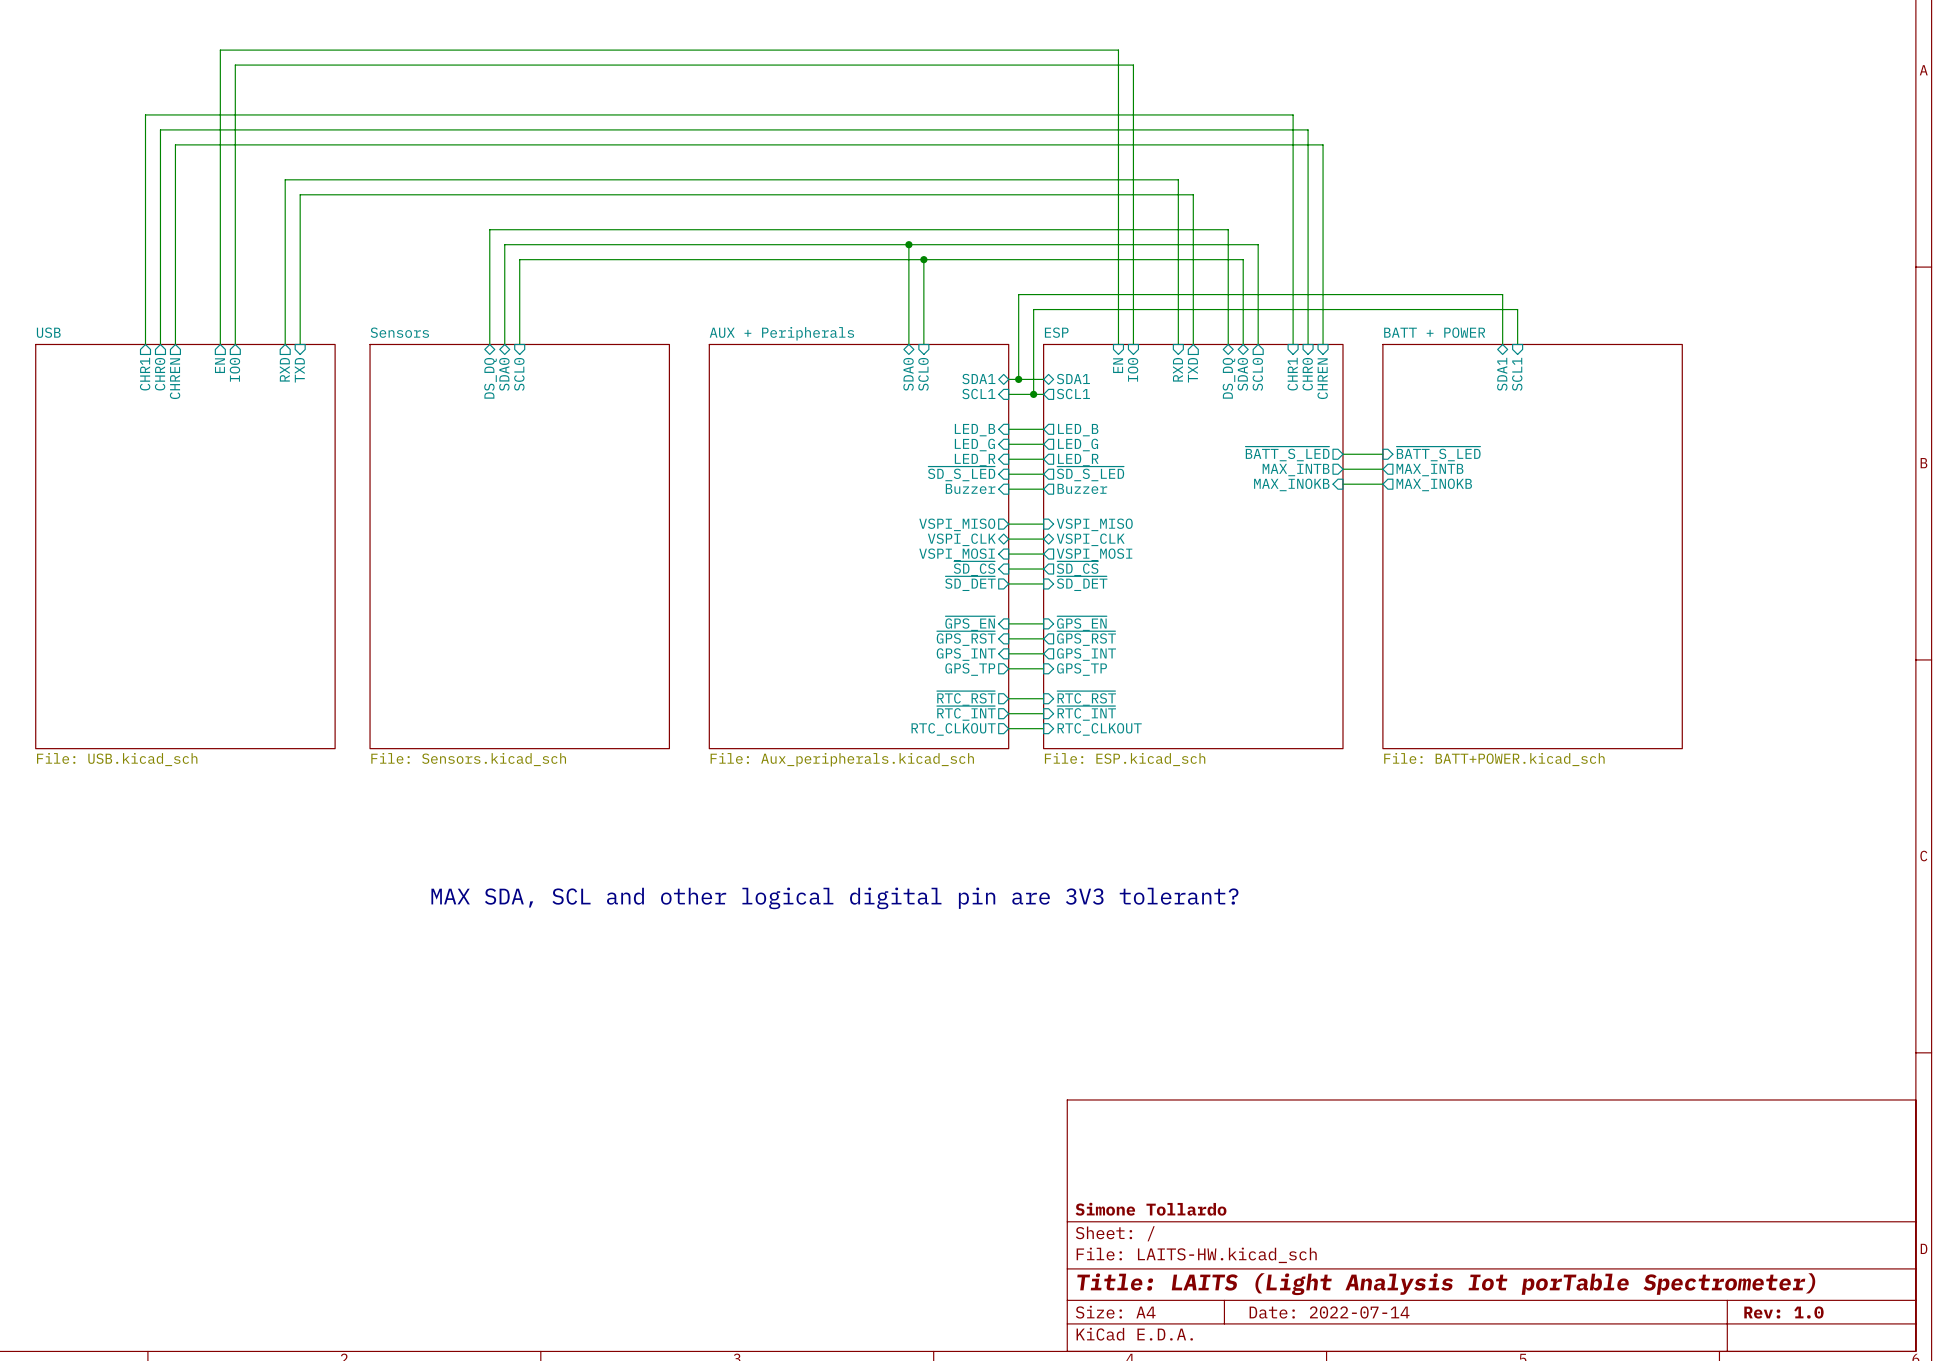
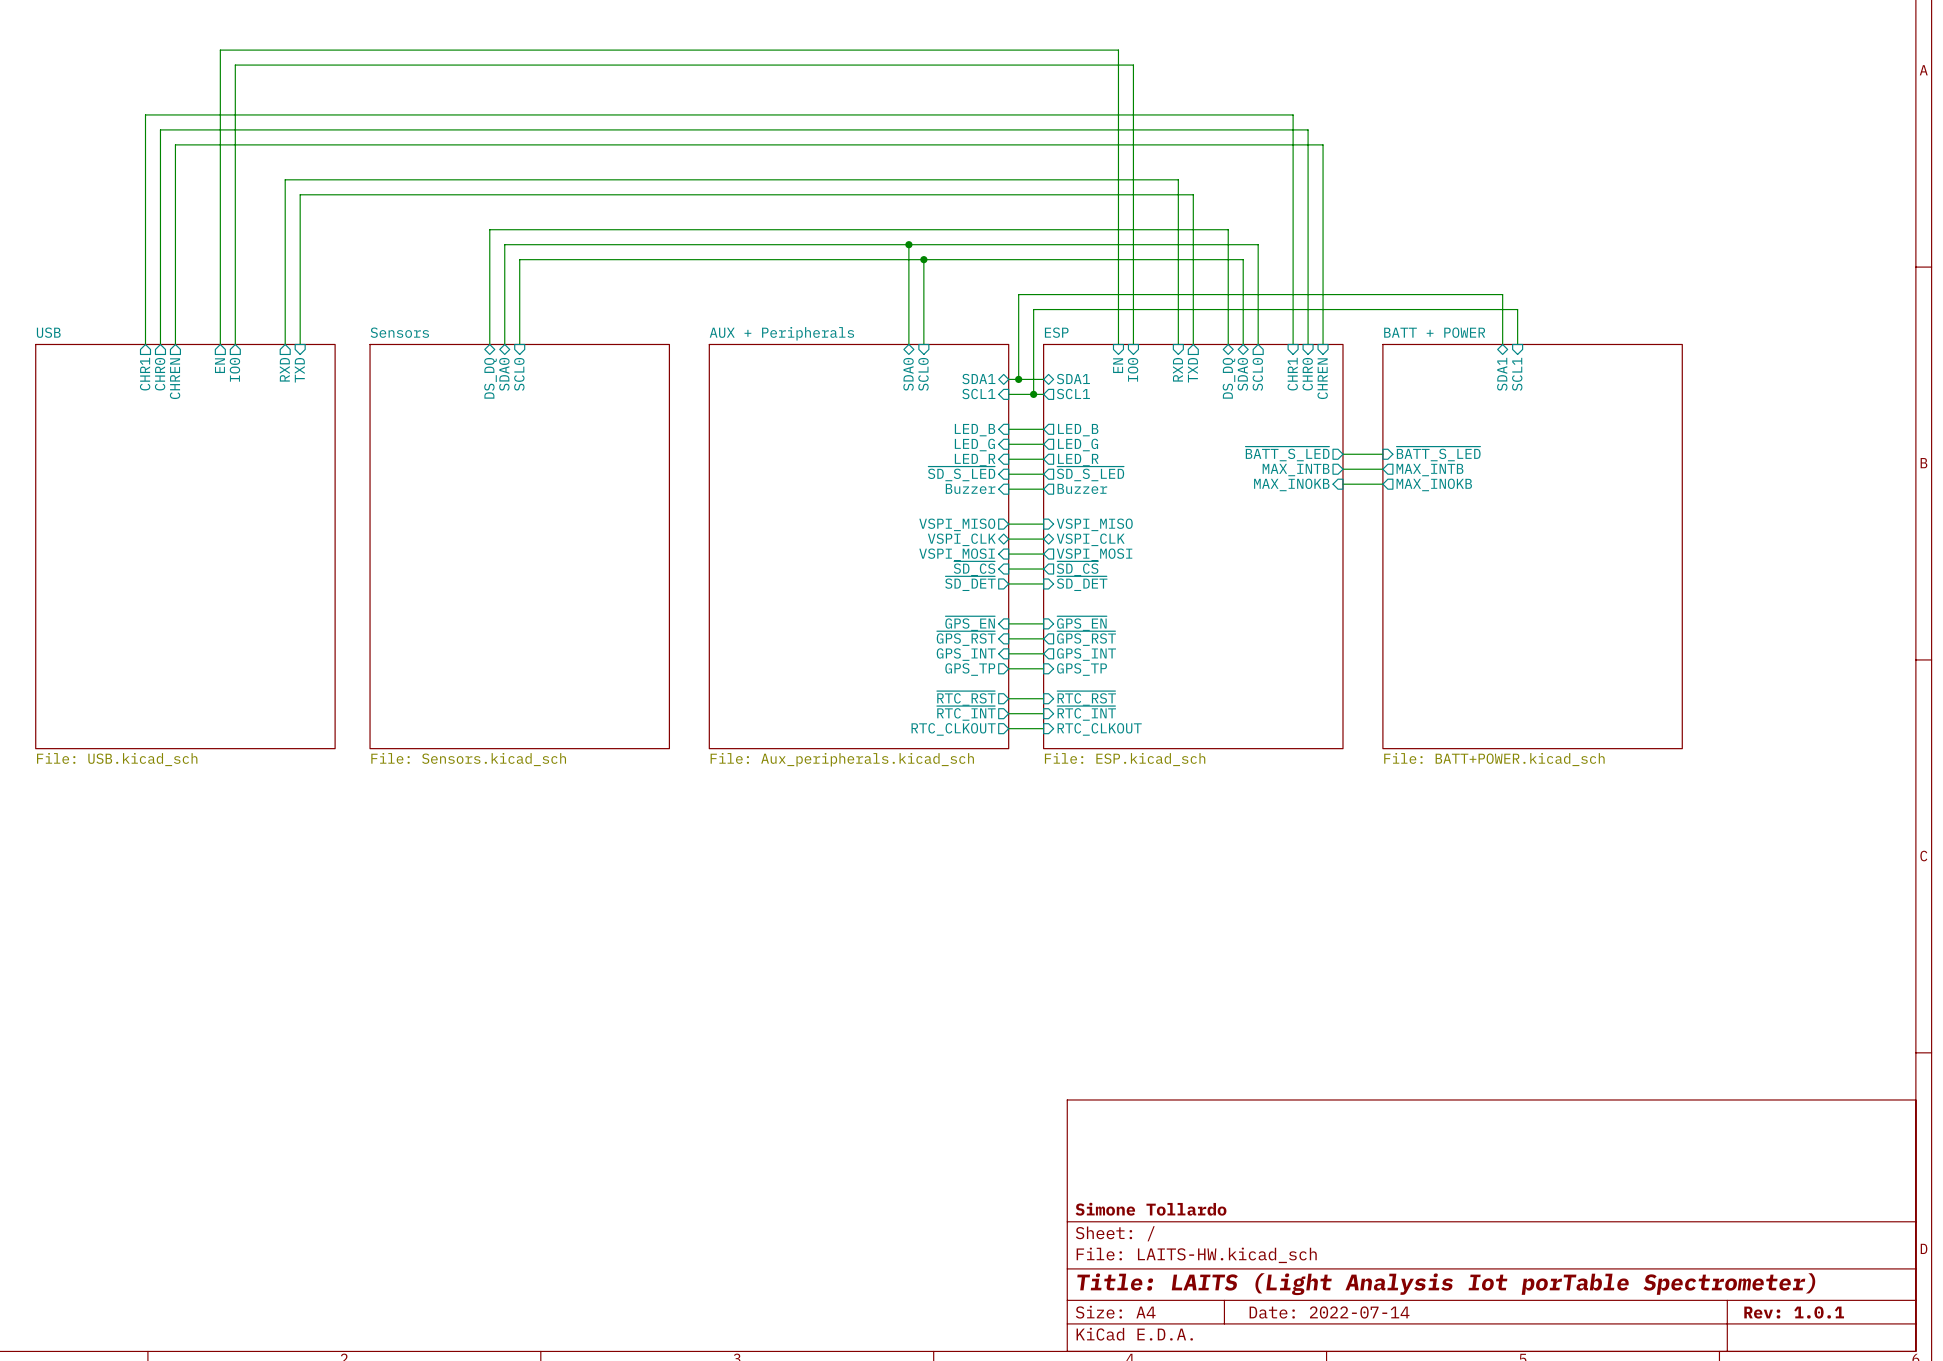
text: MAX SDA, SCL and other logical digital pin are 3V3 tolerant? (834, 898) -> none
title block: Rev: 1.0 (1783, 1312) -> Rev: 1.0.1 (1794, 1312)

